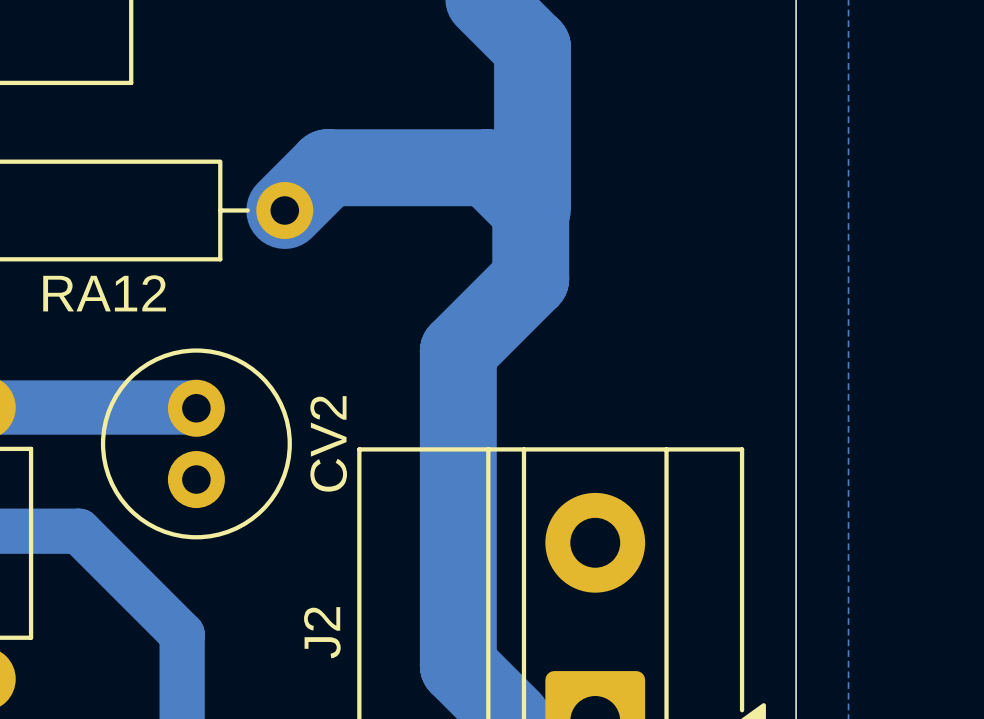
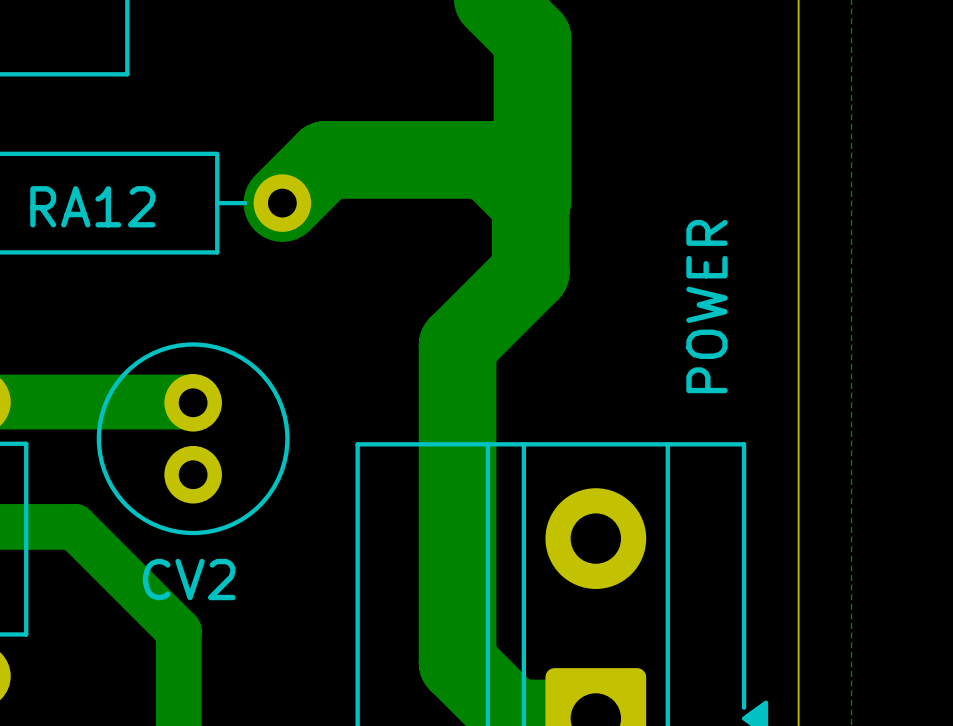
RA12 name position: RA12 (104, 293) -> RA12 (92, 206)
CV2 name rotation: 0° (328, 443) -> 90° clockwise (189, 579)
CV2 name position: CV2 (328, 443) -> CV2 (189, 579)
J2 name: J2 (322, 632) -> POWER (707, 306)

